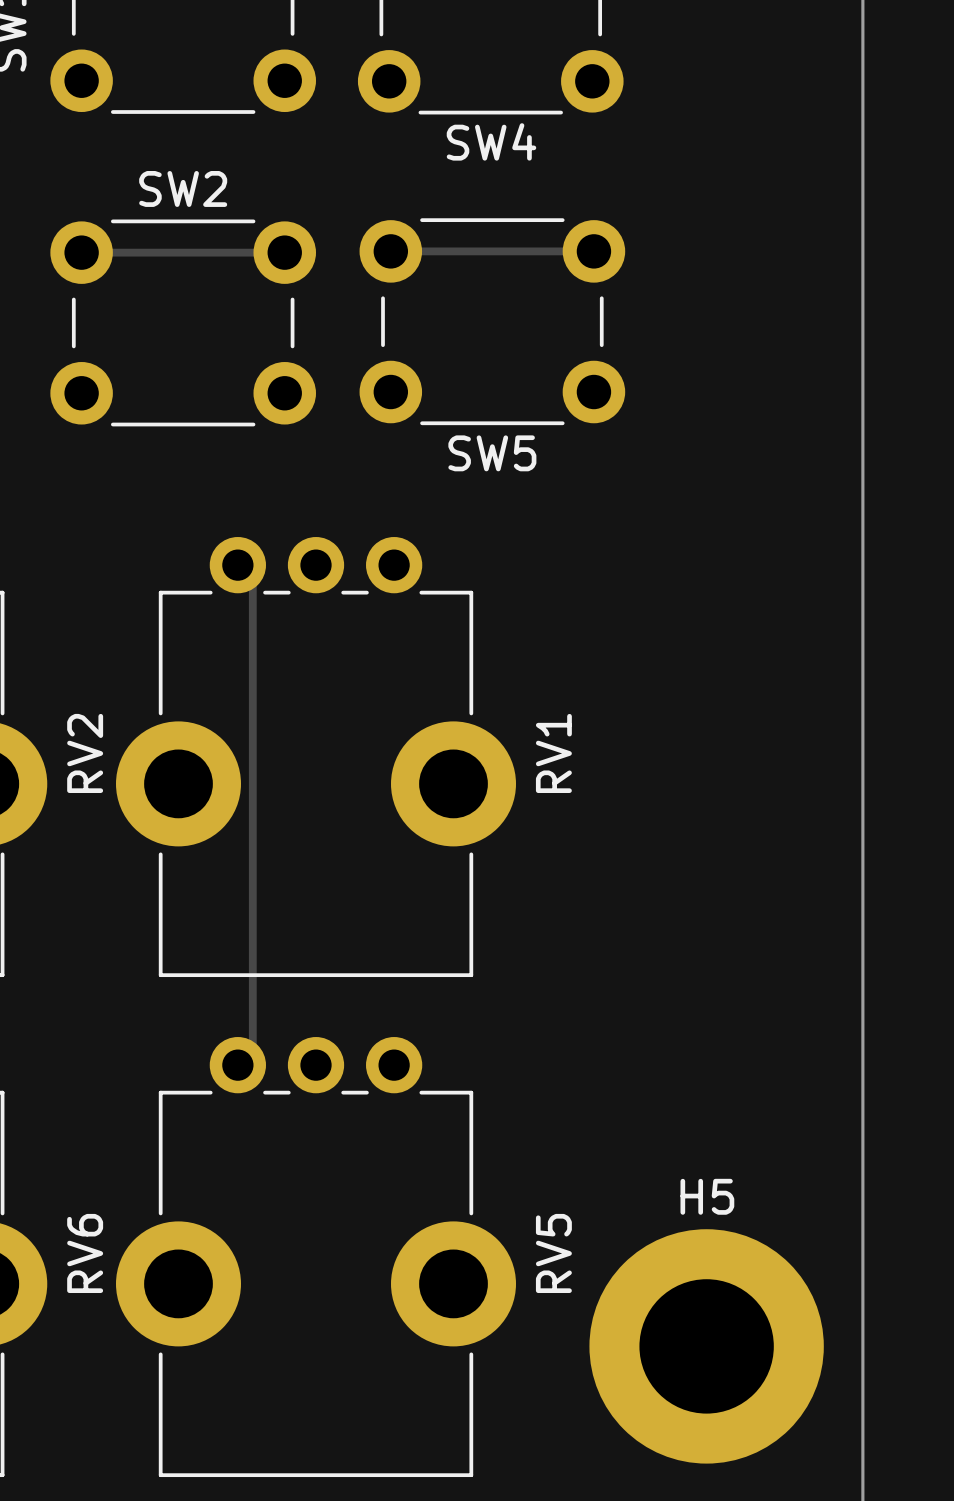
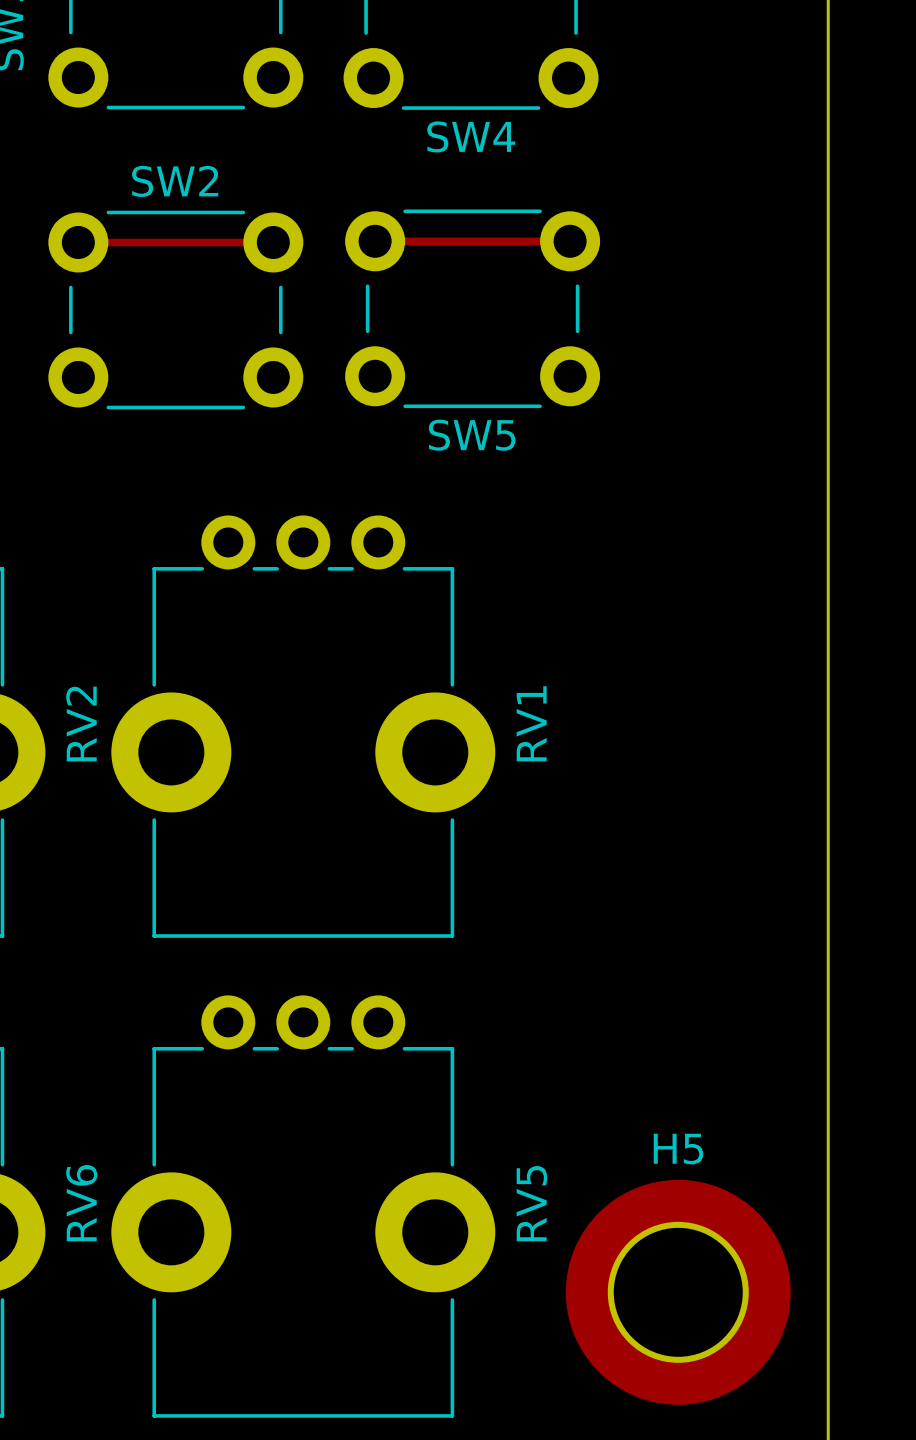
track: (237, 565) (252, 580) (252, 1050) (237, 1065) -> none

